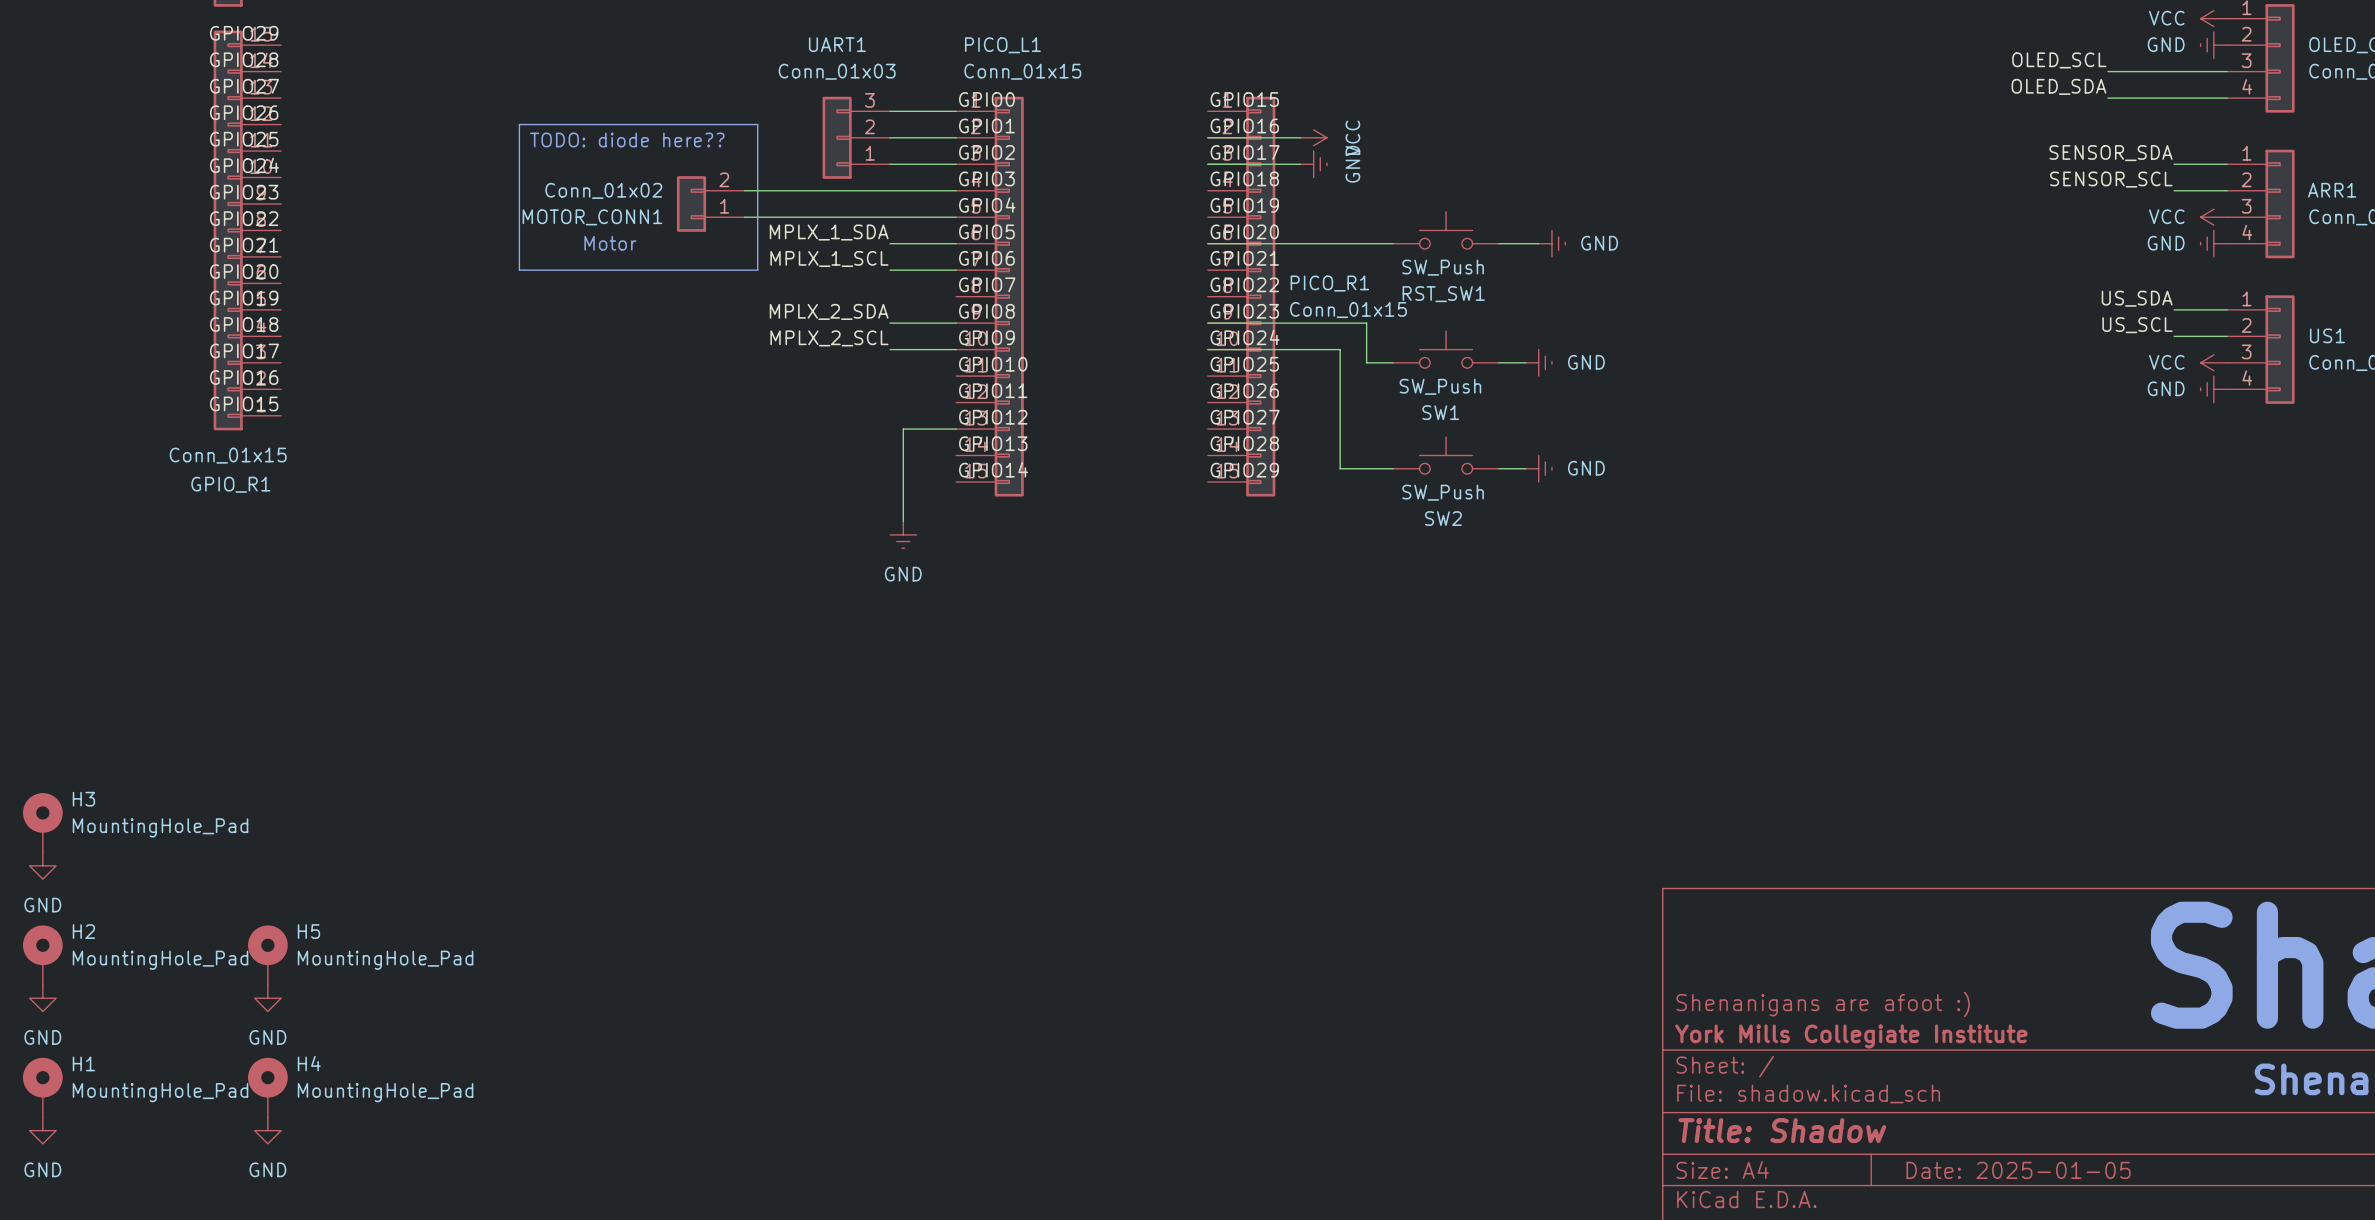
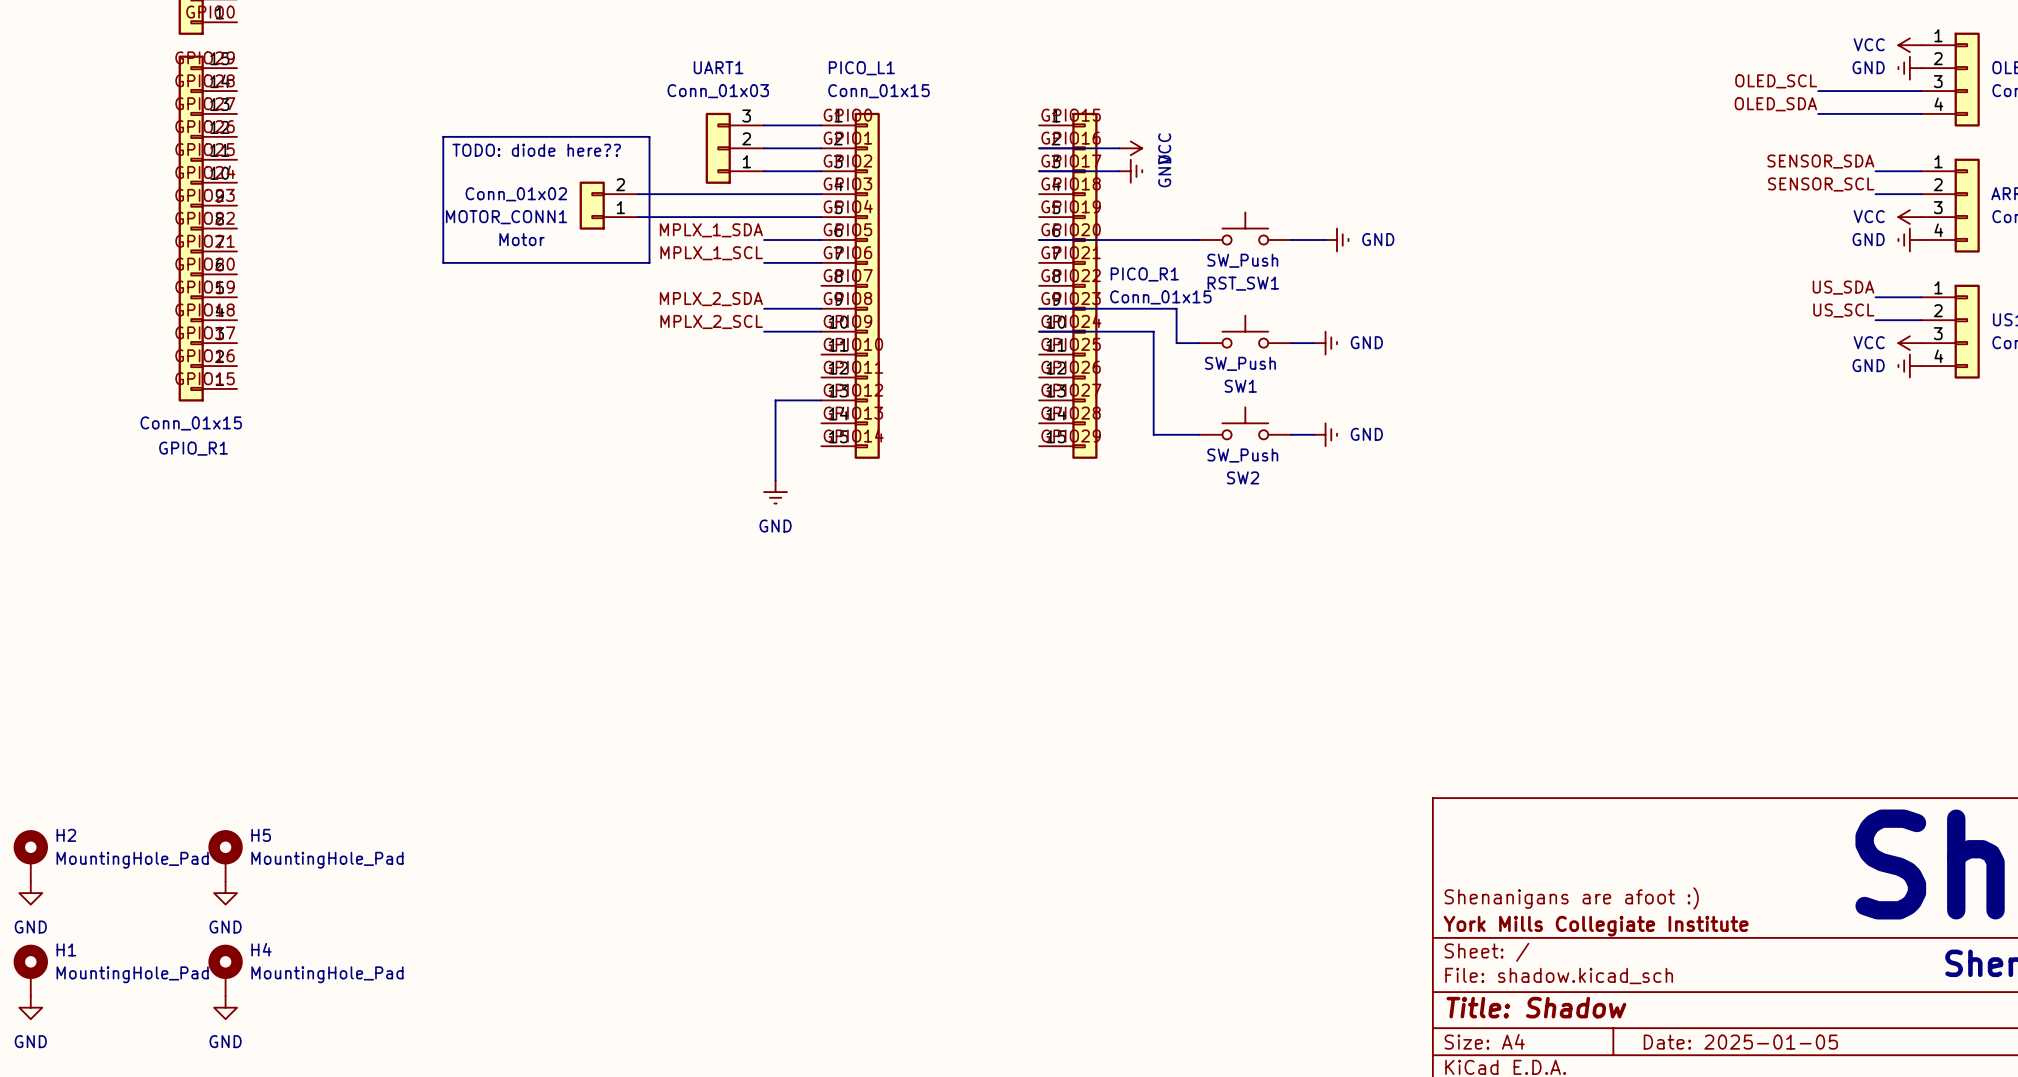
H3: MountingHole_Pad (42, 822) -> none
power symbol: GND (42, 865) -> none

